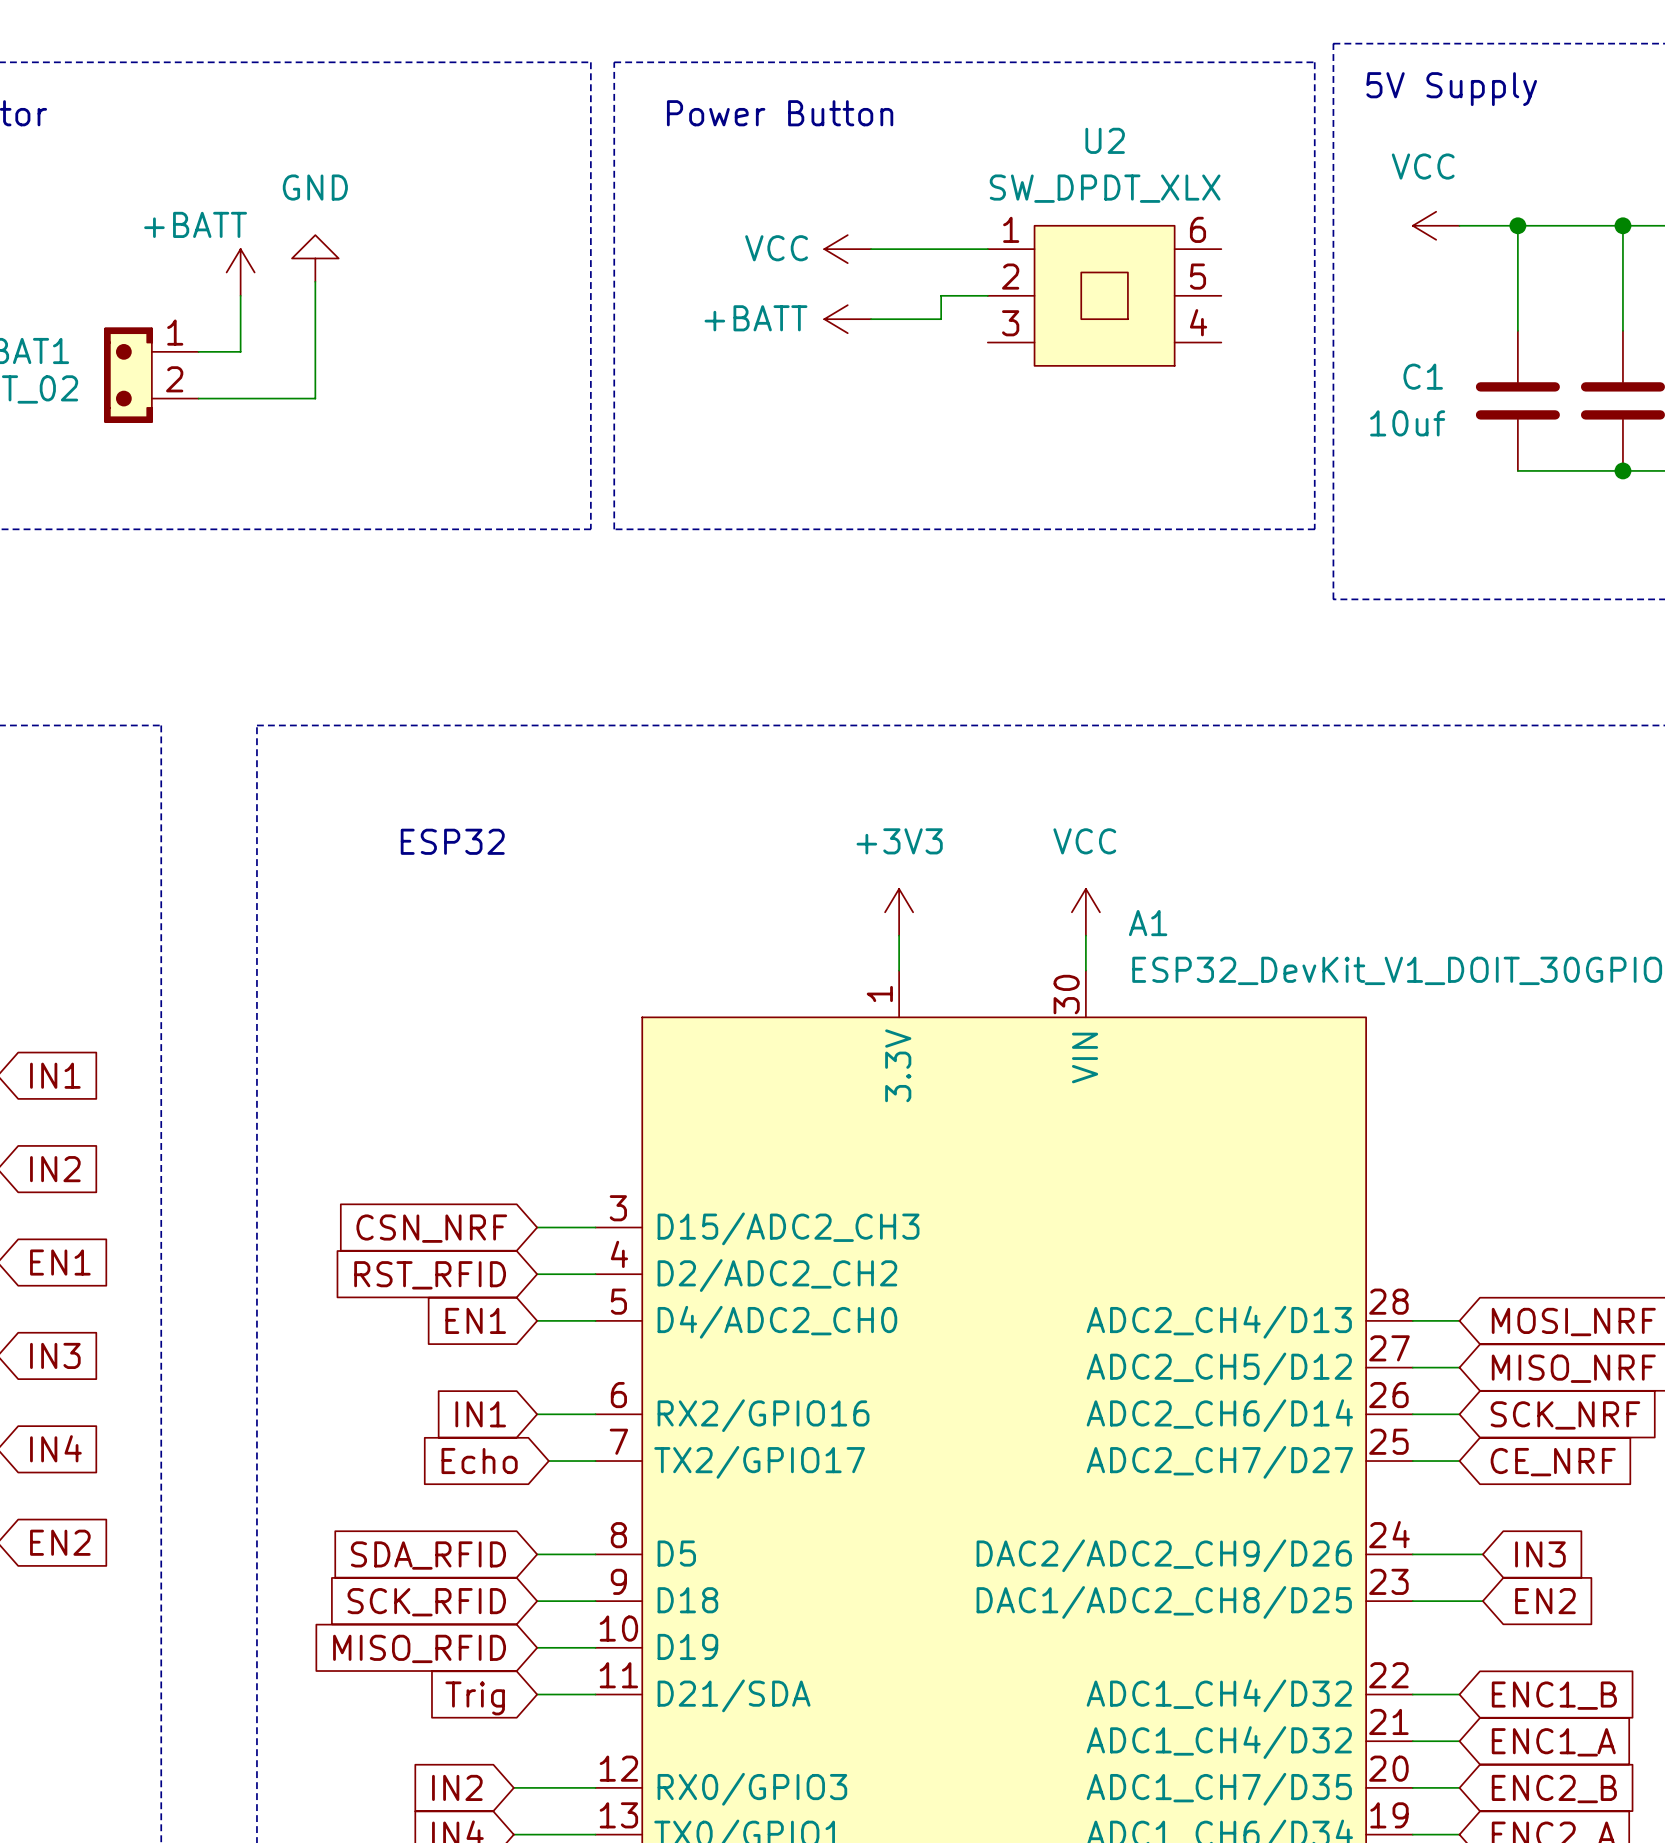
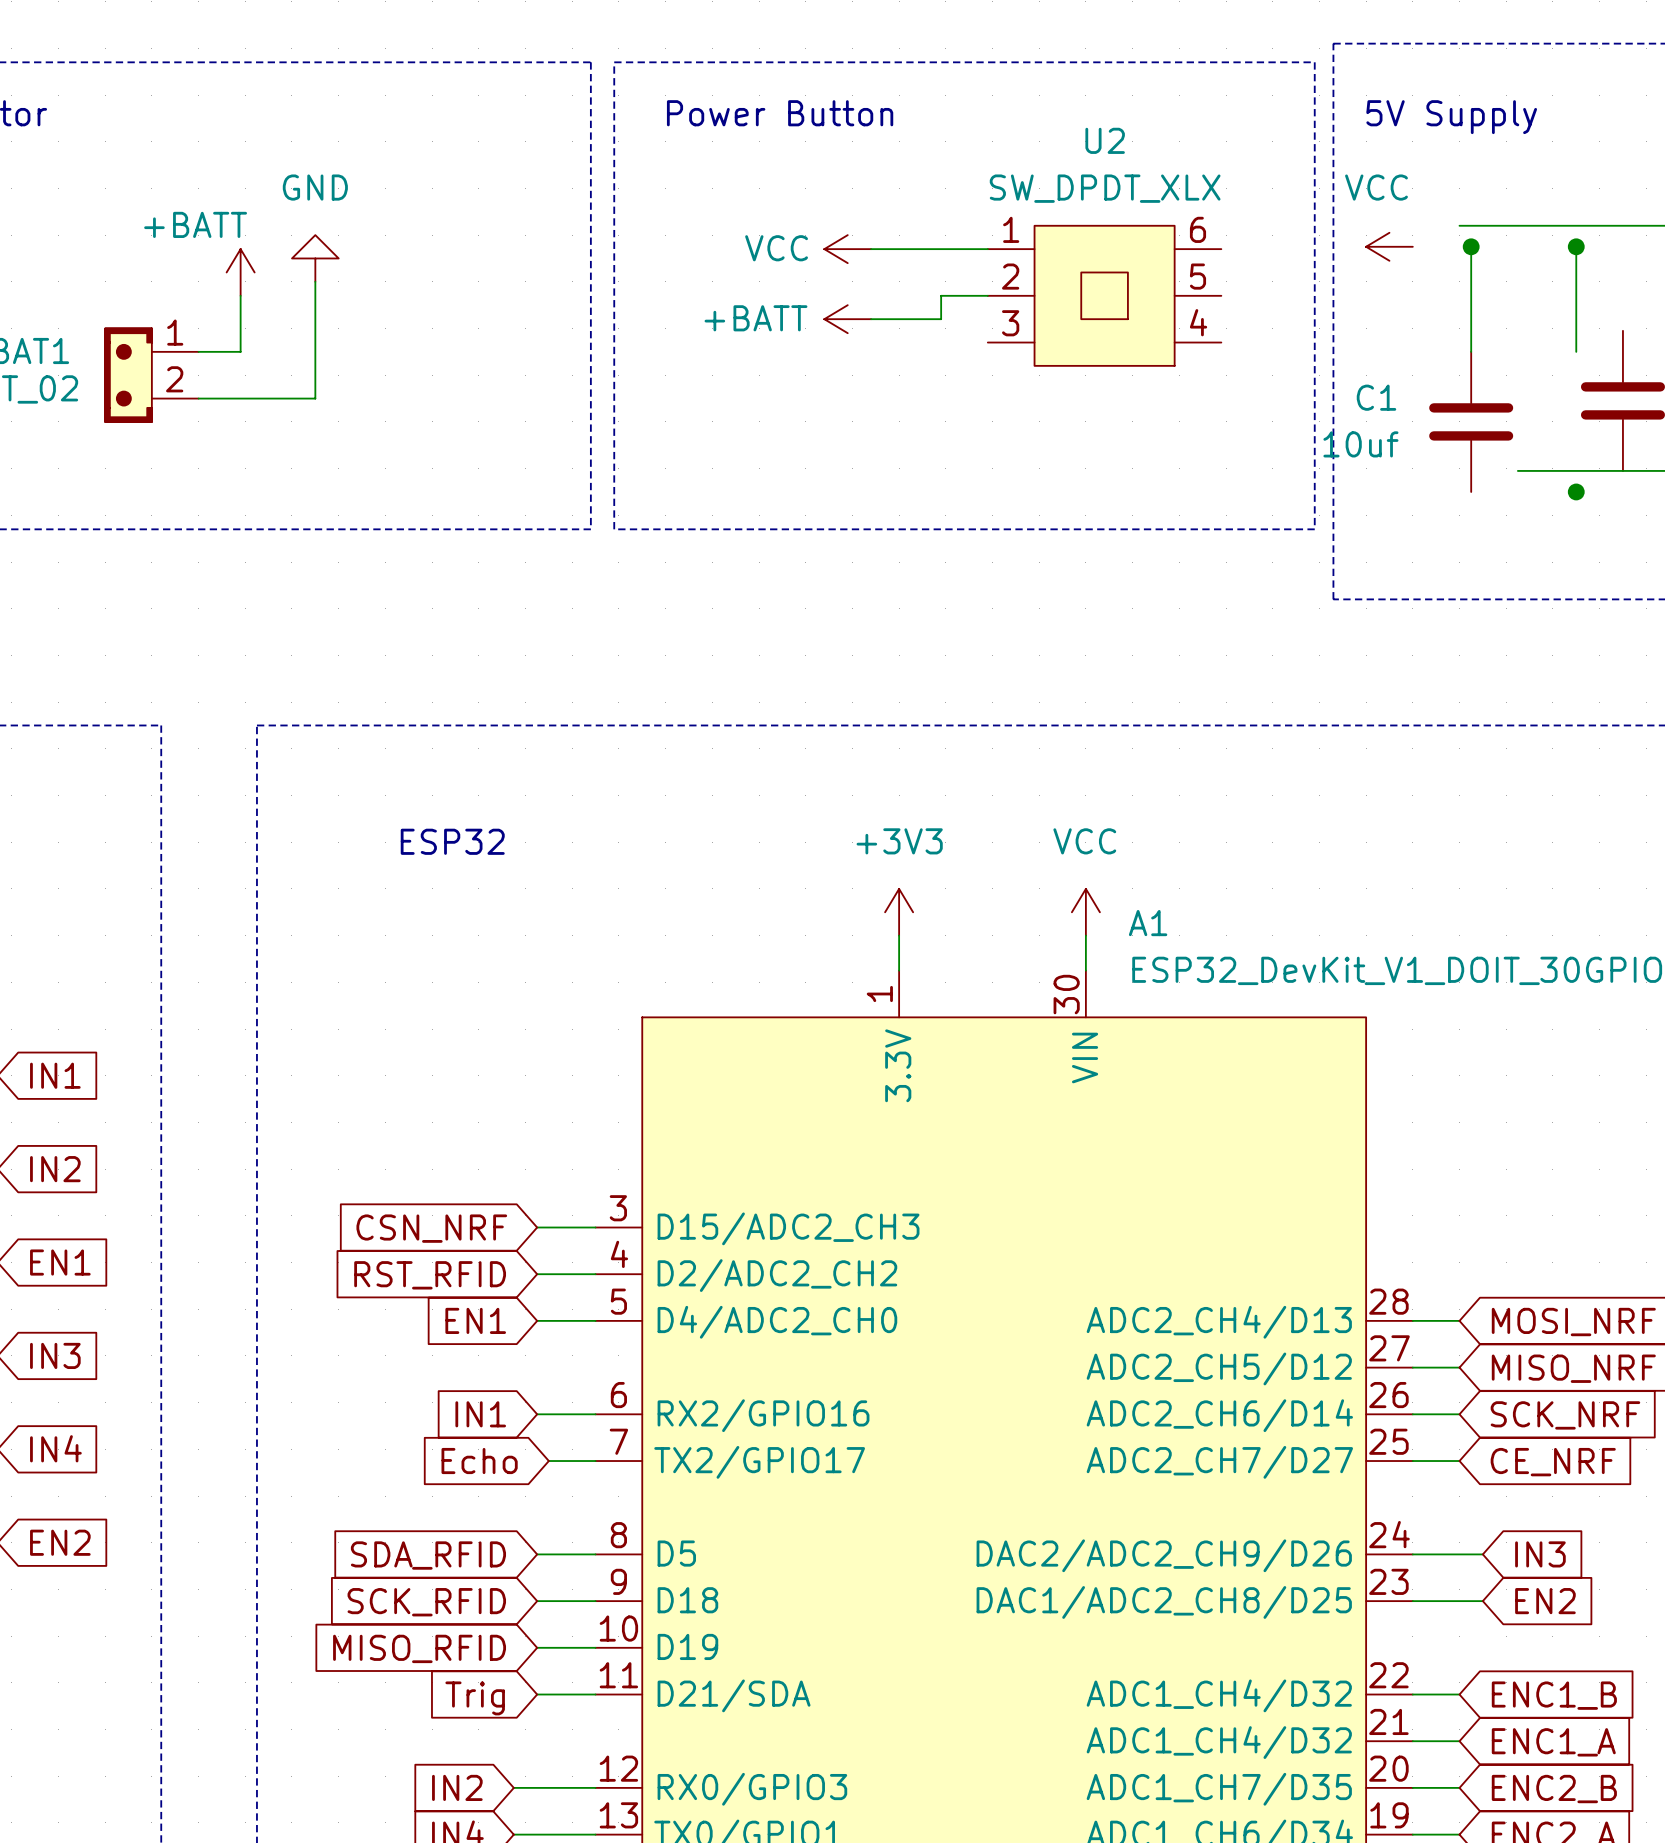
text position: 5V Supply (1451, 89) -> 5V Supply (1451, 117)
power symbol position: VCC (1436, 225) -> VCC (1389, 246)
wire: (1517, 225) (1517, 330) -> (1471, 246) (1471, 351)
junction: (1517, 225) -> none
wire: (1622, 225) (1622, 330) -> (1576, 246) (1576, 351)
junction: (1622, 225) -> none
junction: none -> (1471, 246)
junction: none -> (1576, 246)
C1 position: (1517, 400) -> (1471, 421)
junction position: (1622, 470) -> (1576, 491)

